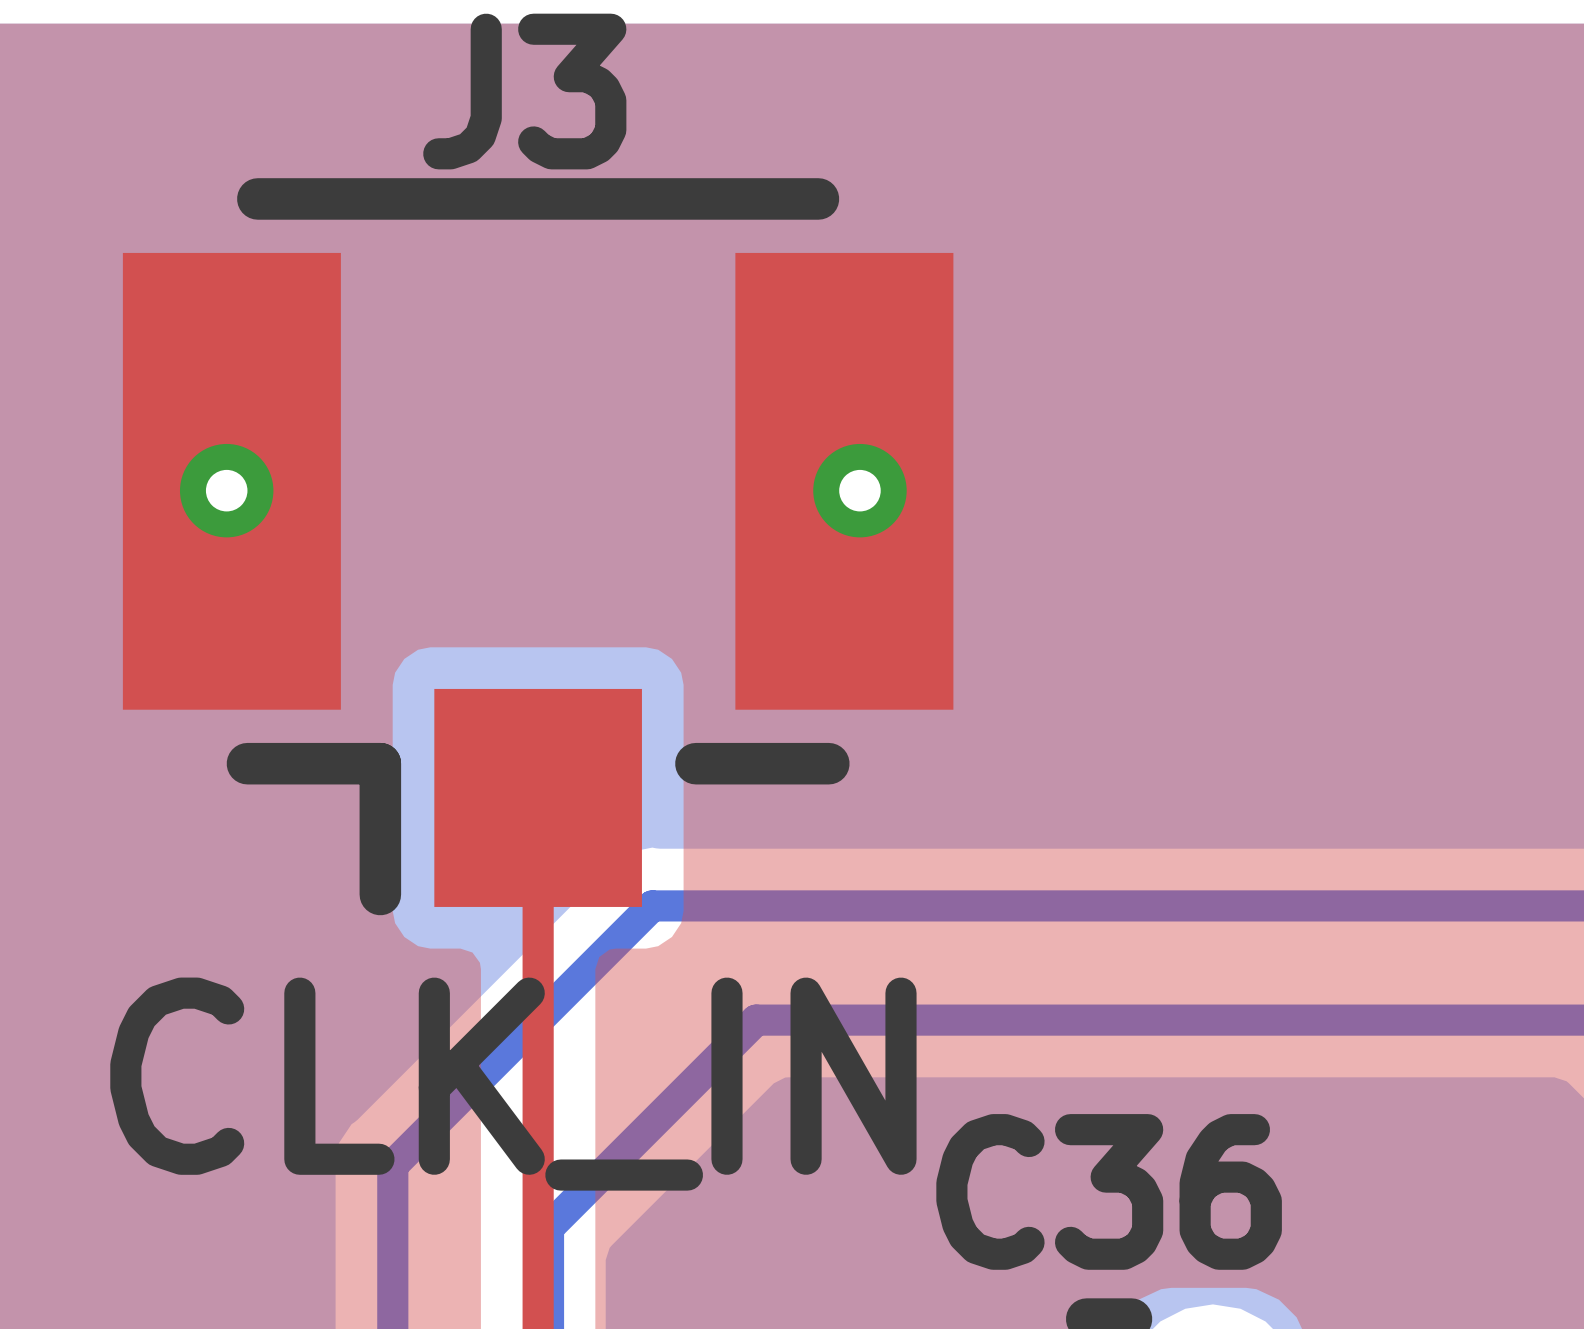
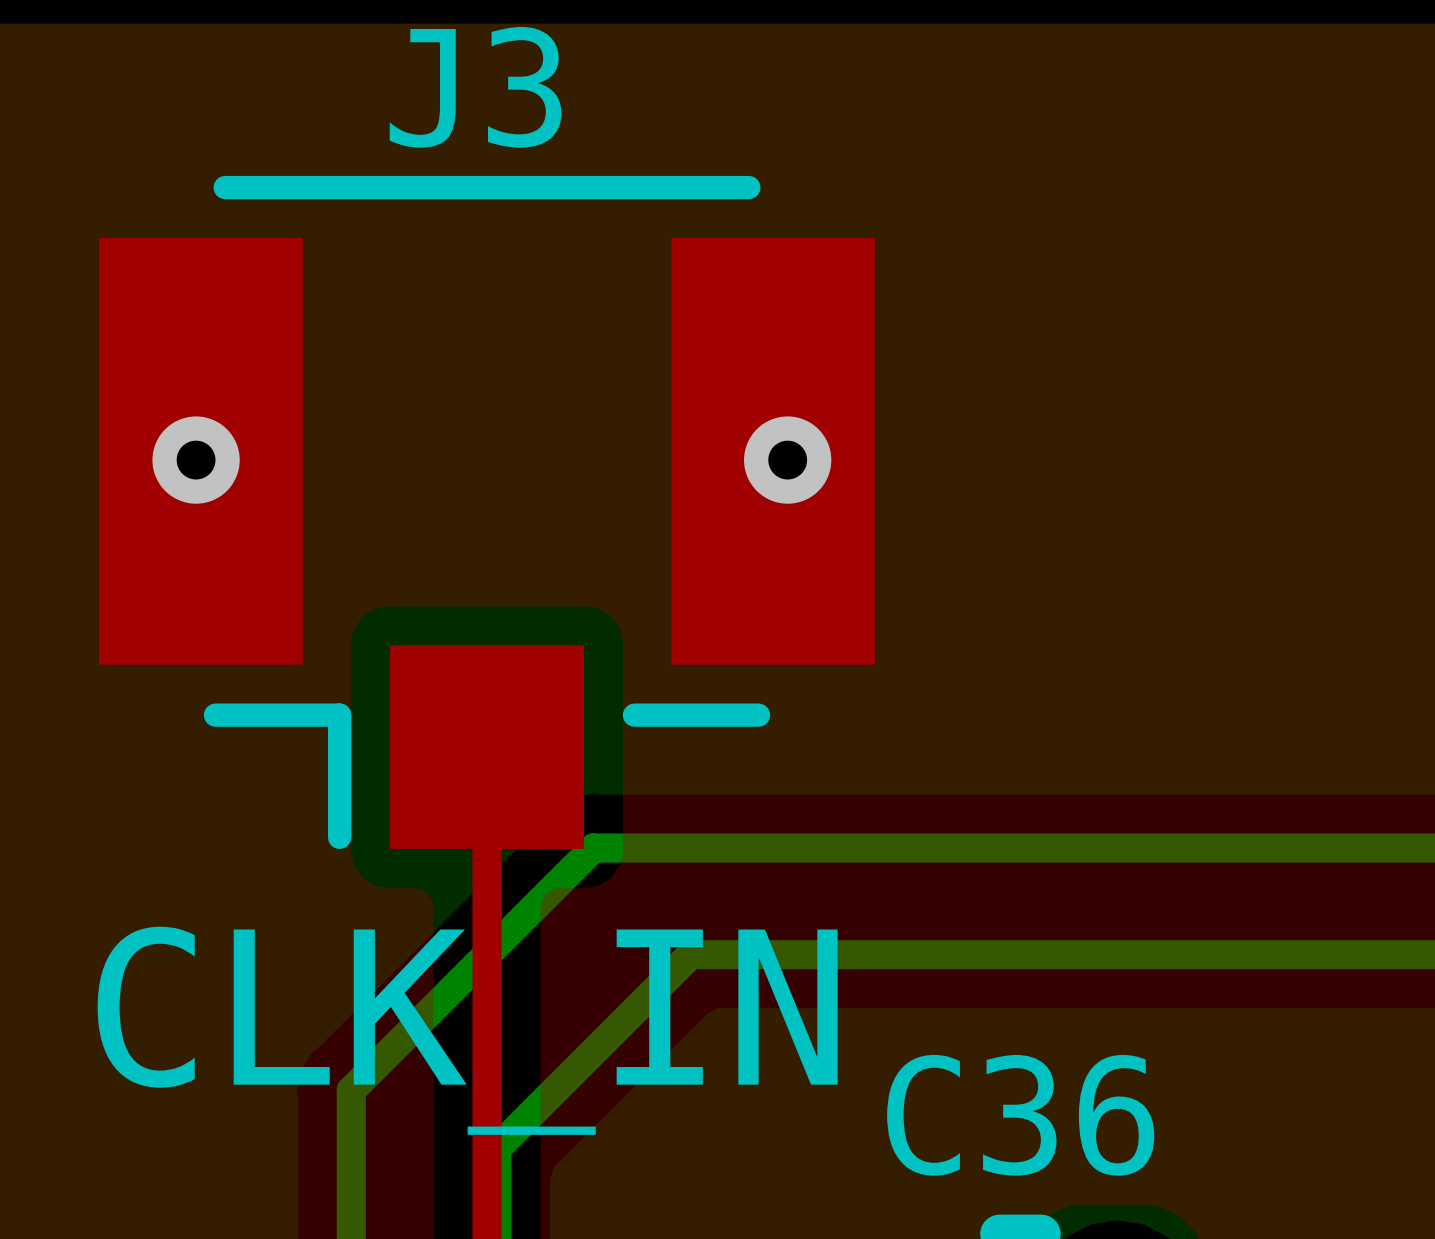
J3 footprint: [122, 178, 954, 916] -> [99, 175, 875, 849]

